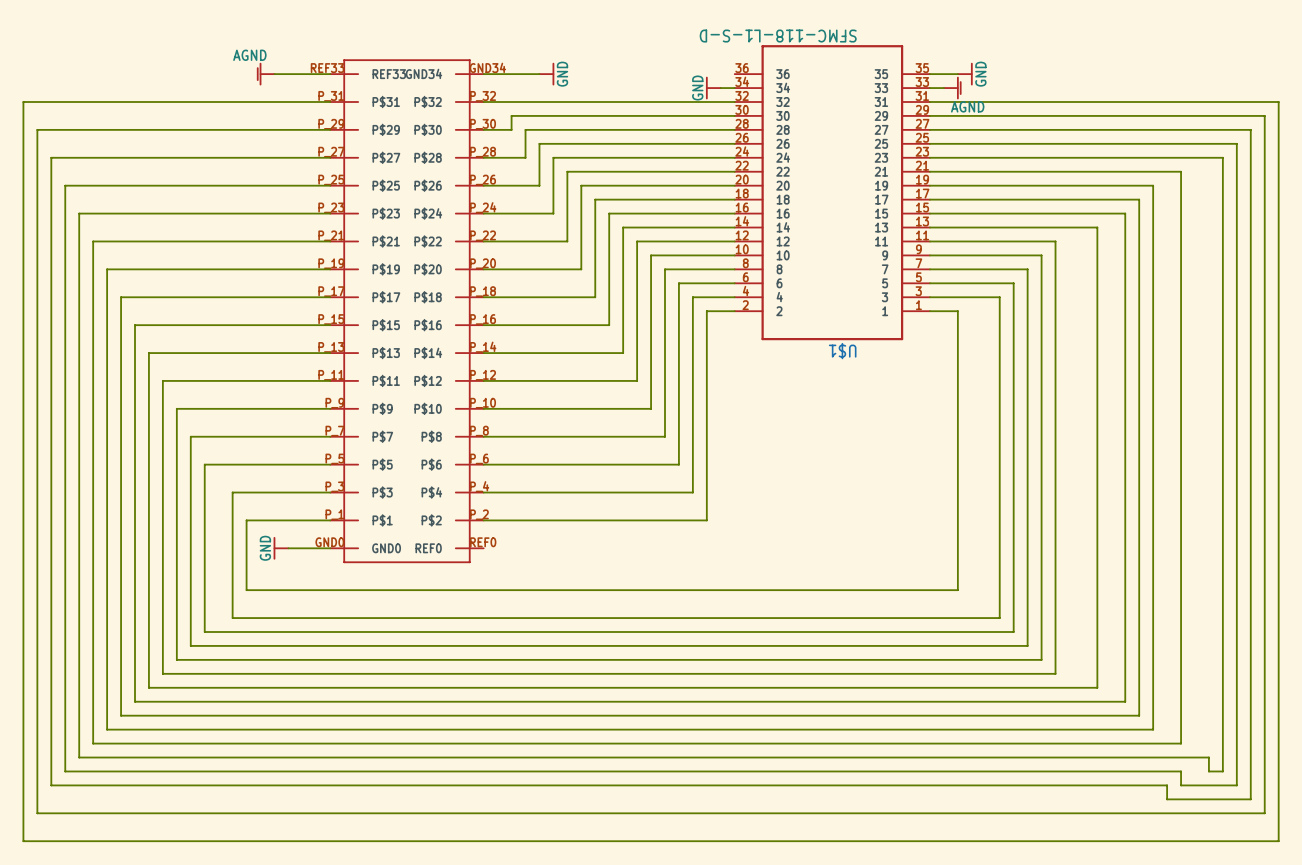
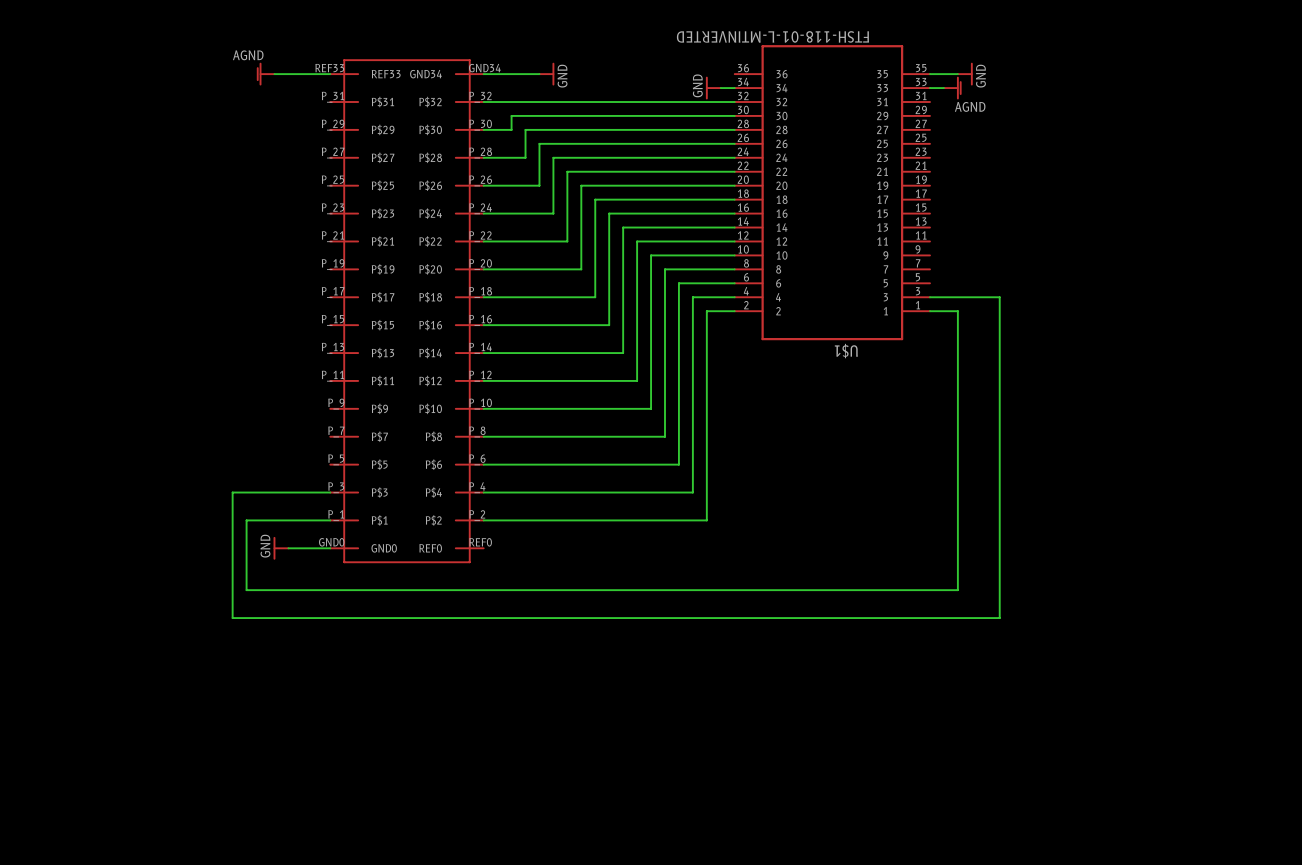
U$1 value: SFMC-118-L1-S-D (778, 36) -> FTSH-118-01-L-MTINVERTED (772, 36)
wire: (330, 102) (23, 102) (23, 841) (1278, 841) (1278, 102) (929, 102) -> none
wire: (929, 115) (1264, 115) (1264, 813) (37, 813) (37, 129) (330, 129) -> none
wire: (929, 129) (1250, 129) (1250, 799) (1167, 799) (1167, 785) (51, 785) (51, 157) (330, 157) -> none
wire: (929, 143) (1236, 143) (1236, 785) (1181, 785) (1181, 771) (65, 771) (65, 185) (330, 185) -> none
wire: (929, 157) (1222, 157) (1222, 771) (1208, 771) (1208, 757) (79, 757) (79, 213) (330, 213) -> none
wire: (929, 171) (1181, 171) (1181, 743) (93, 743) (93, 241) (330, 241) -> none
wire: (929, 185) (1153, 185) (1153, 729) (107, 729) (107, 269) (330, 269) -> none
wire: (929, 199) (1139, 199) (1139, 715) (121, 715) (121, 297) (330, 297) -> none
wire: (929, 213) (1125, 213) (1125, 701) (135, 701) (135, 325) (330, 325) -> none
wire: (929, 227) (1097, 227) (1097, 687) (148, 687) (148, 353) (330, 353) -> none
wire: (929, 241) (1055, 241) (1055, 673) (162, 673) (162, 380) (330, 380) -> none
wire: (929, 255) (1041, 255) (1041, 659) (176, 659) (176, 408) (330, 408) -> none
wire: (929, 269) (1027, 269) (1027, 645) (190, 645) (190, 436) (330, 436) -> none
wire: (929, 283) (1013, 283) (1013, 632) (204, 632) (204, 464) (330, 464) -> none

